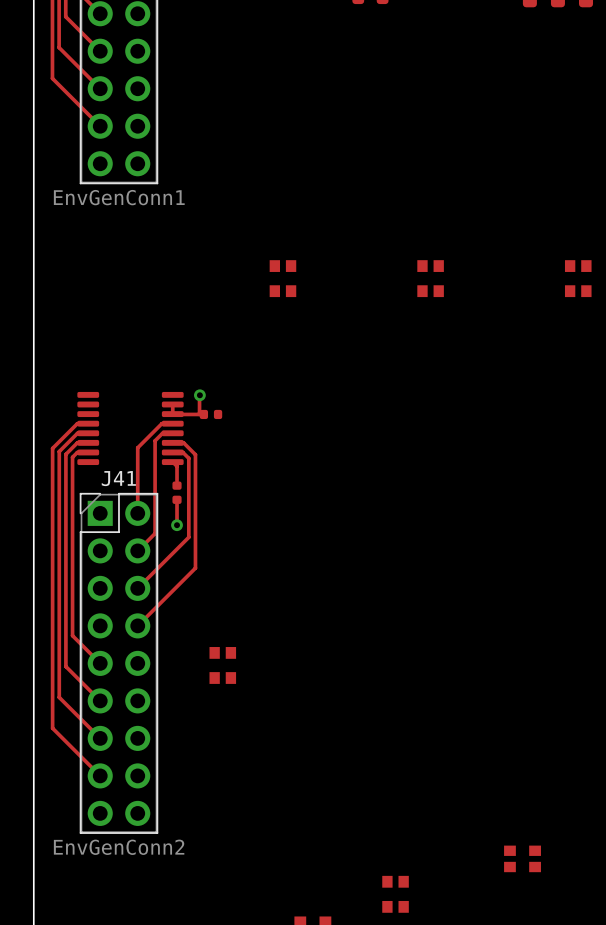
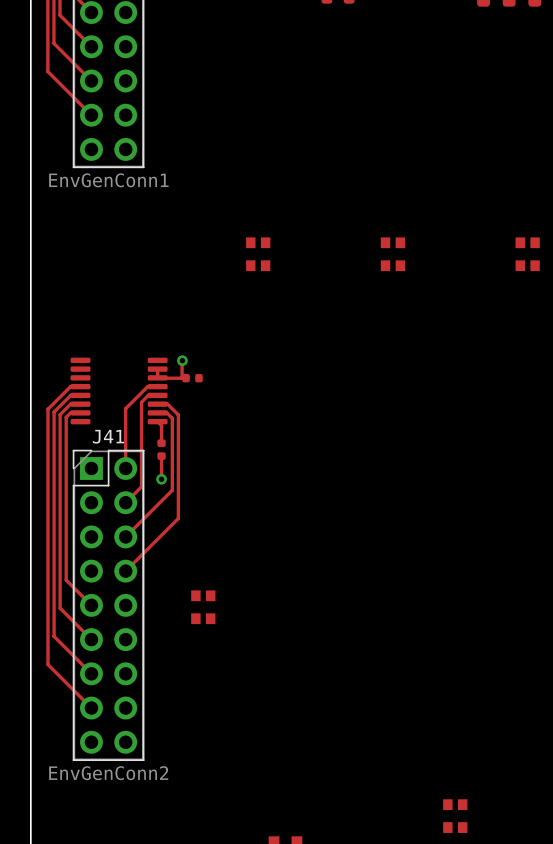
part rotation: 0° (522, 858) -> 90° clockwise (455, 816)
part position: (522, 858) -> (455, 816)
part: (395, 894) -> none

